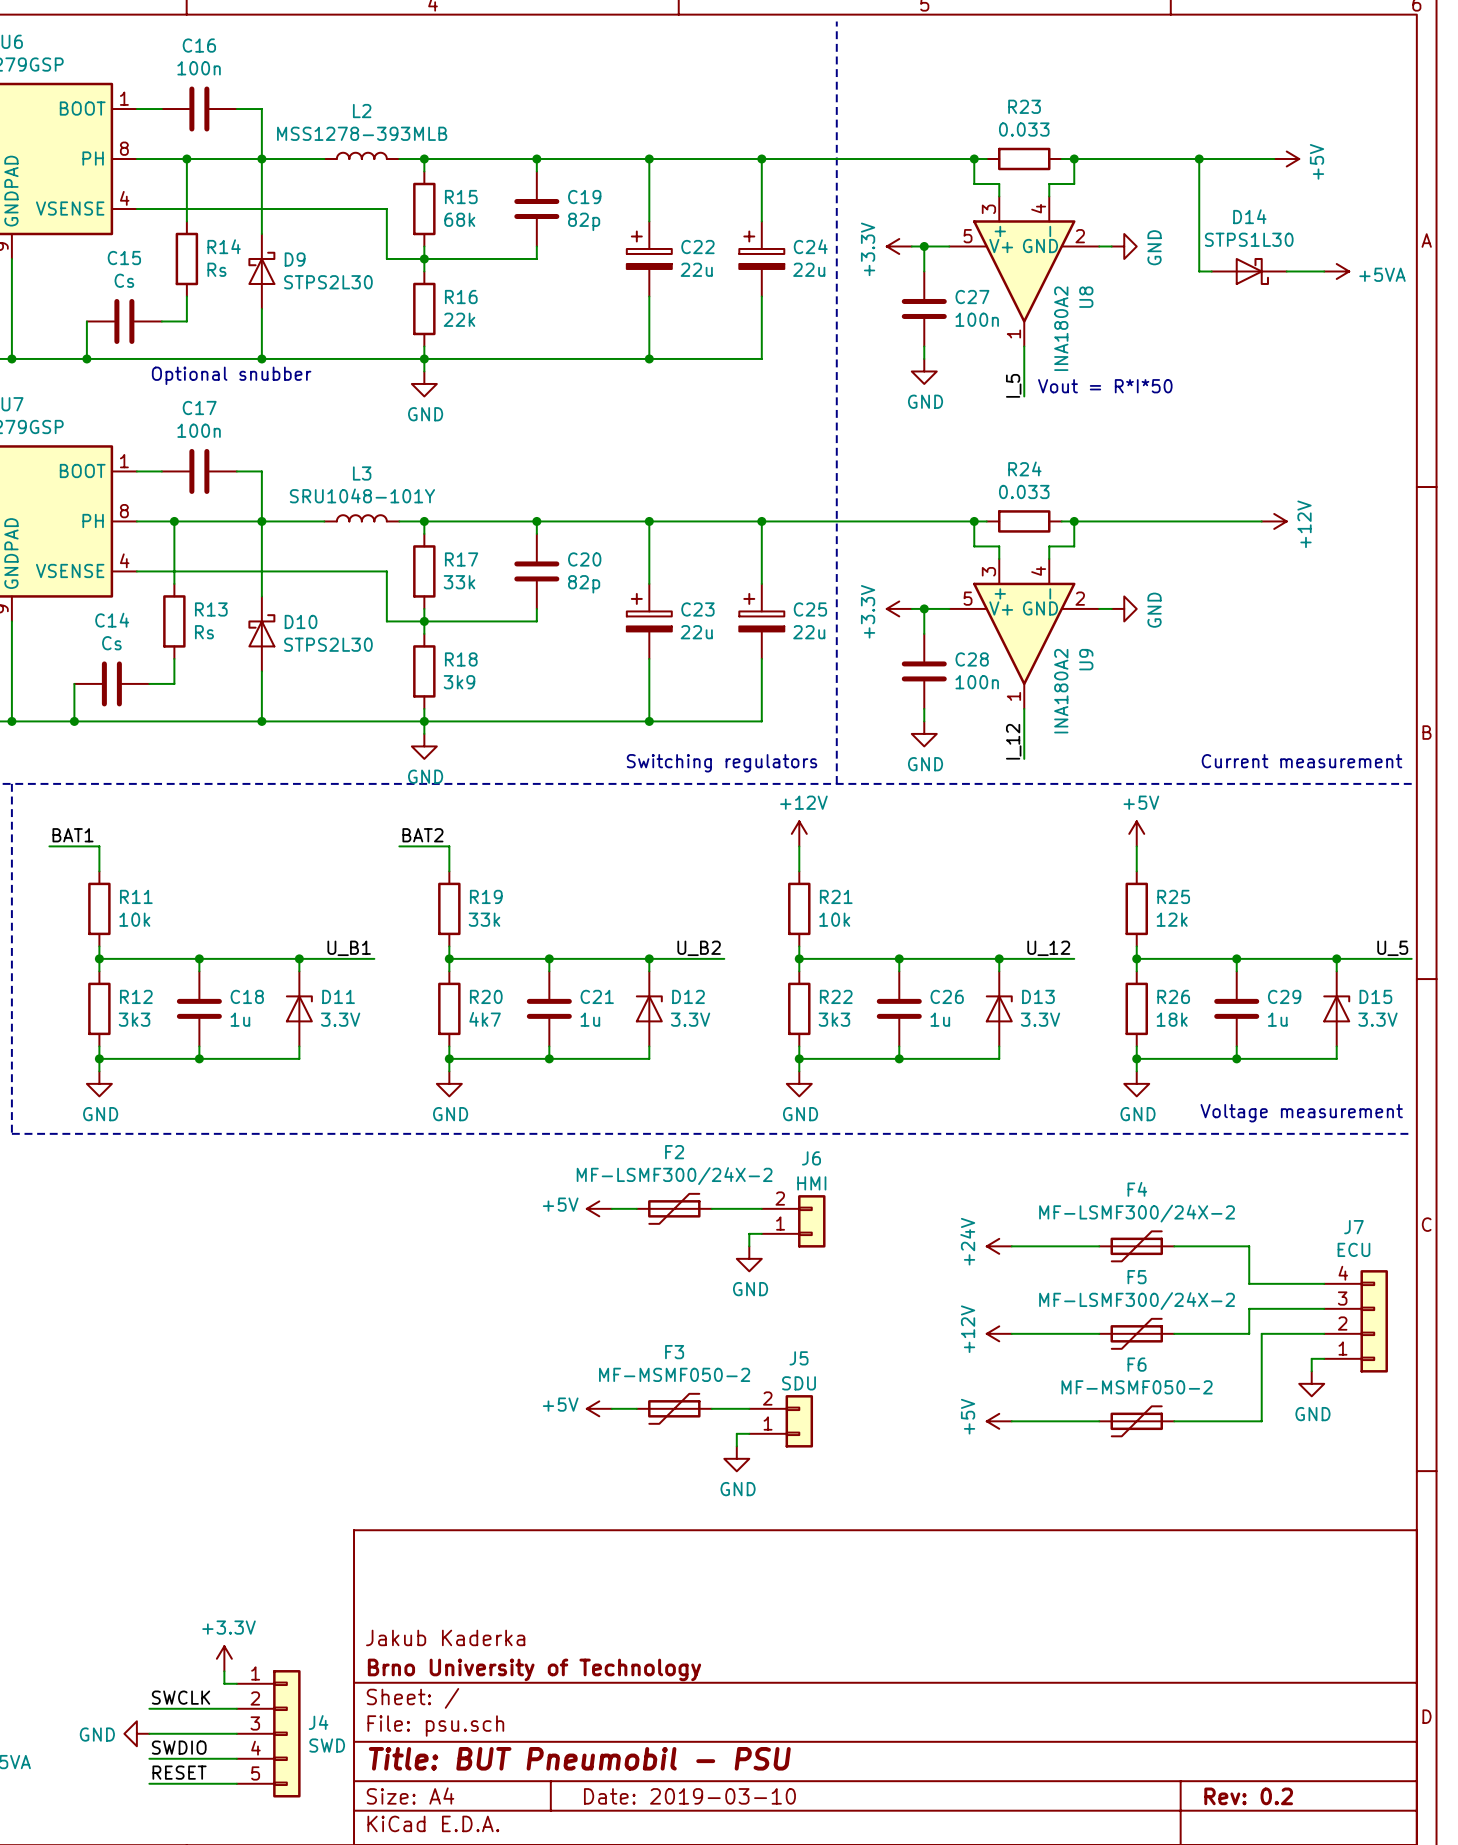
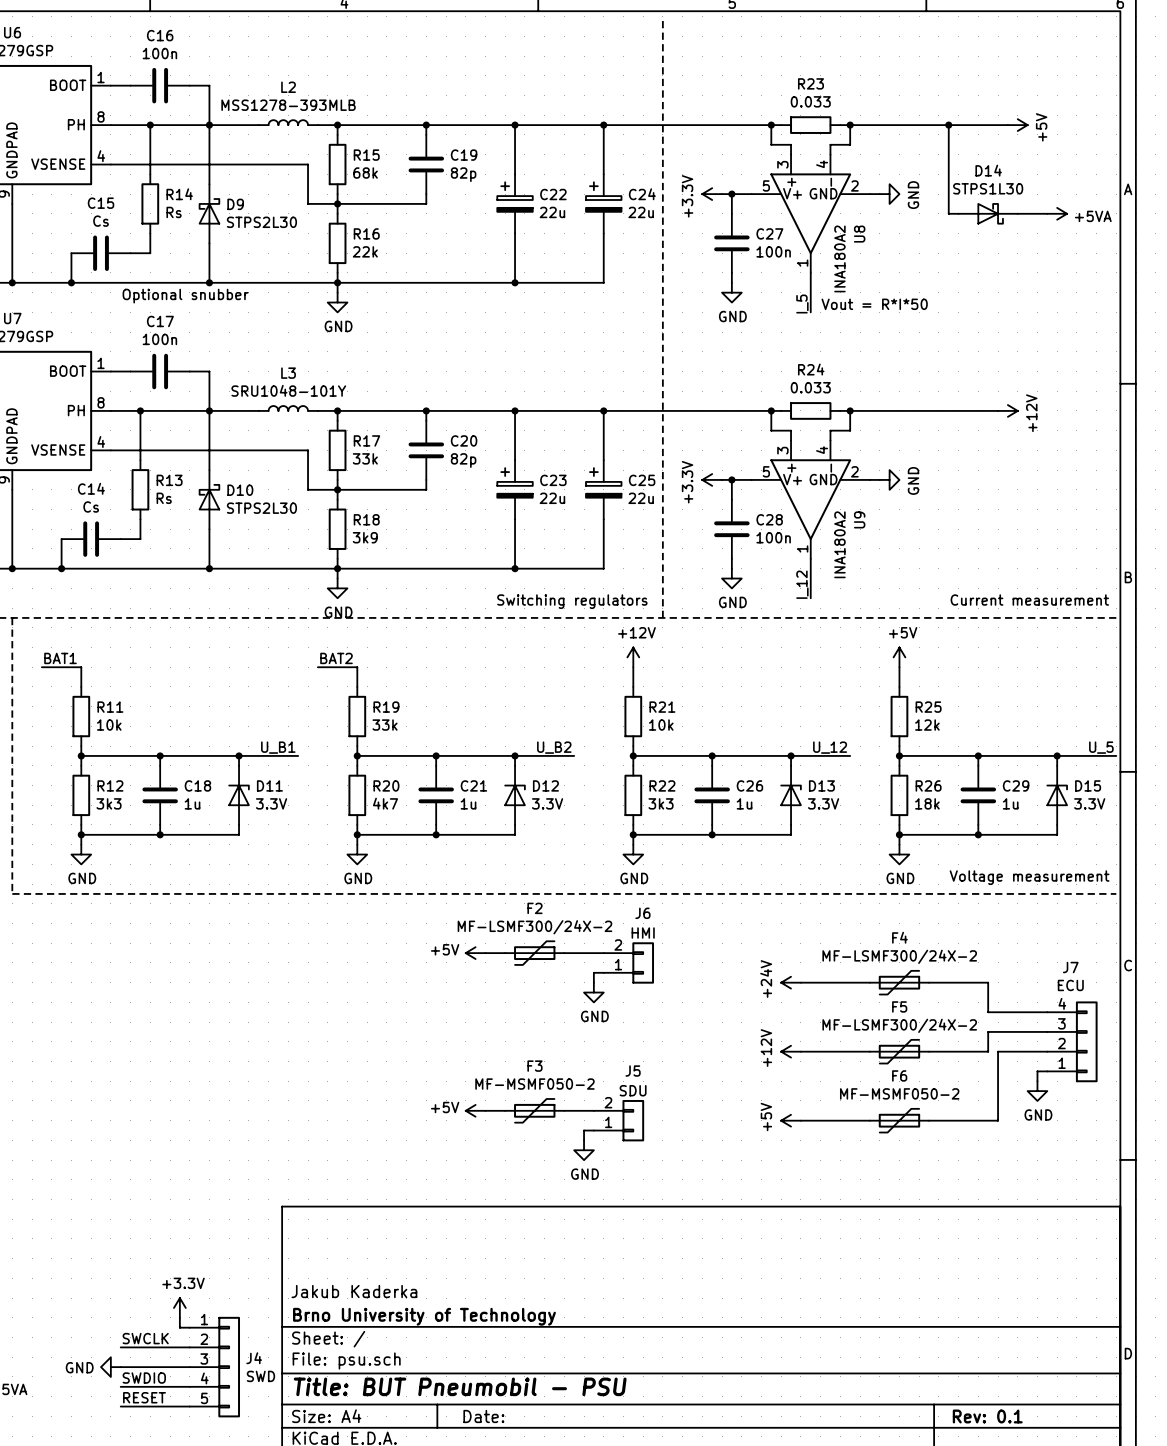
title block: Date: 2019-03-10 (689, 1796) -> Date: (483, 1416)
title block: Rev: 0.2 (1248, 1796) -> Rev: 0.1 (987, 1416)

